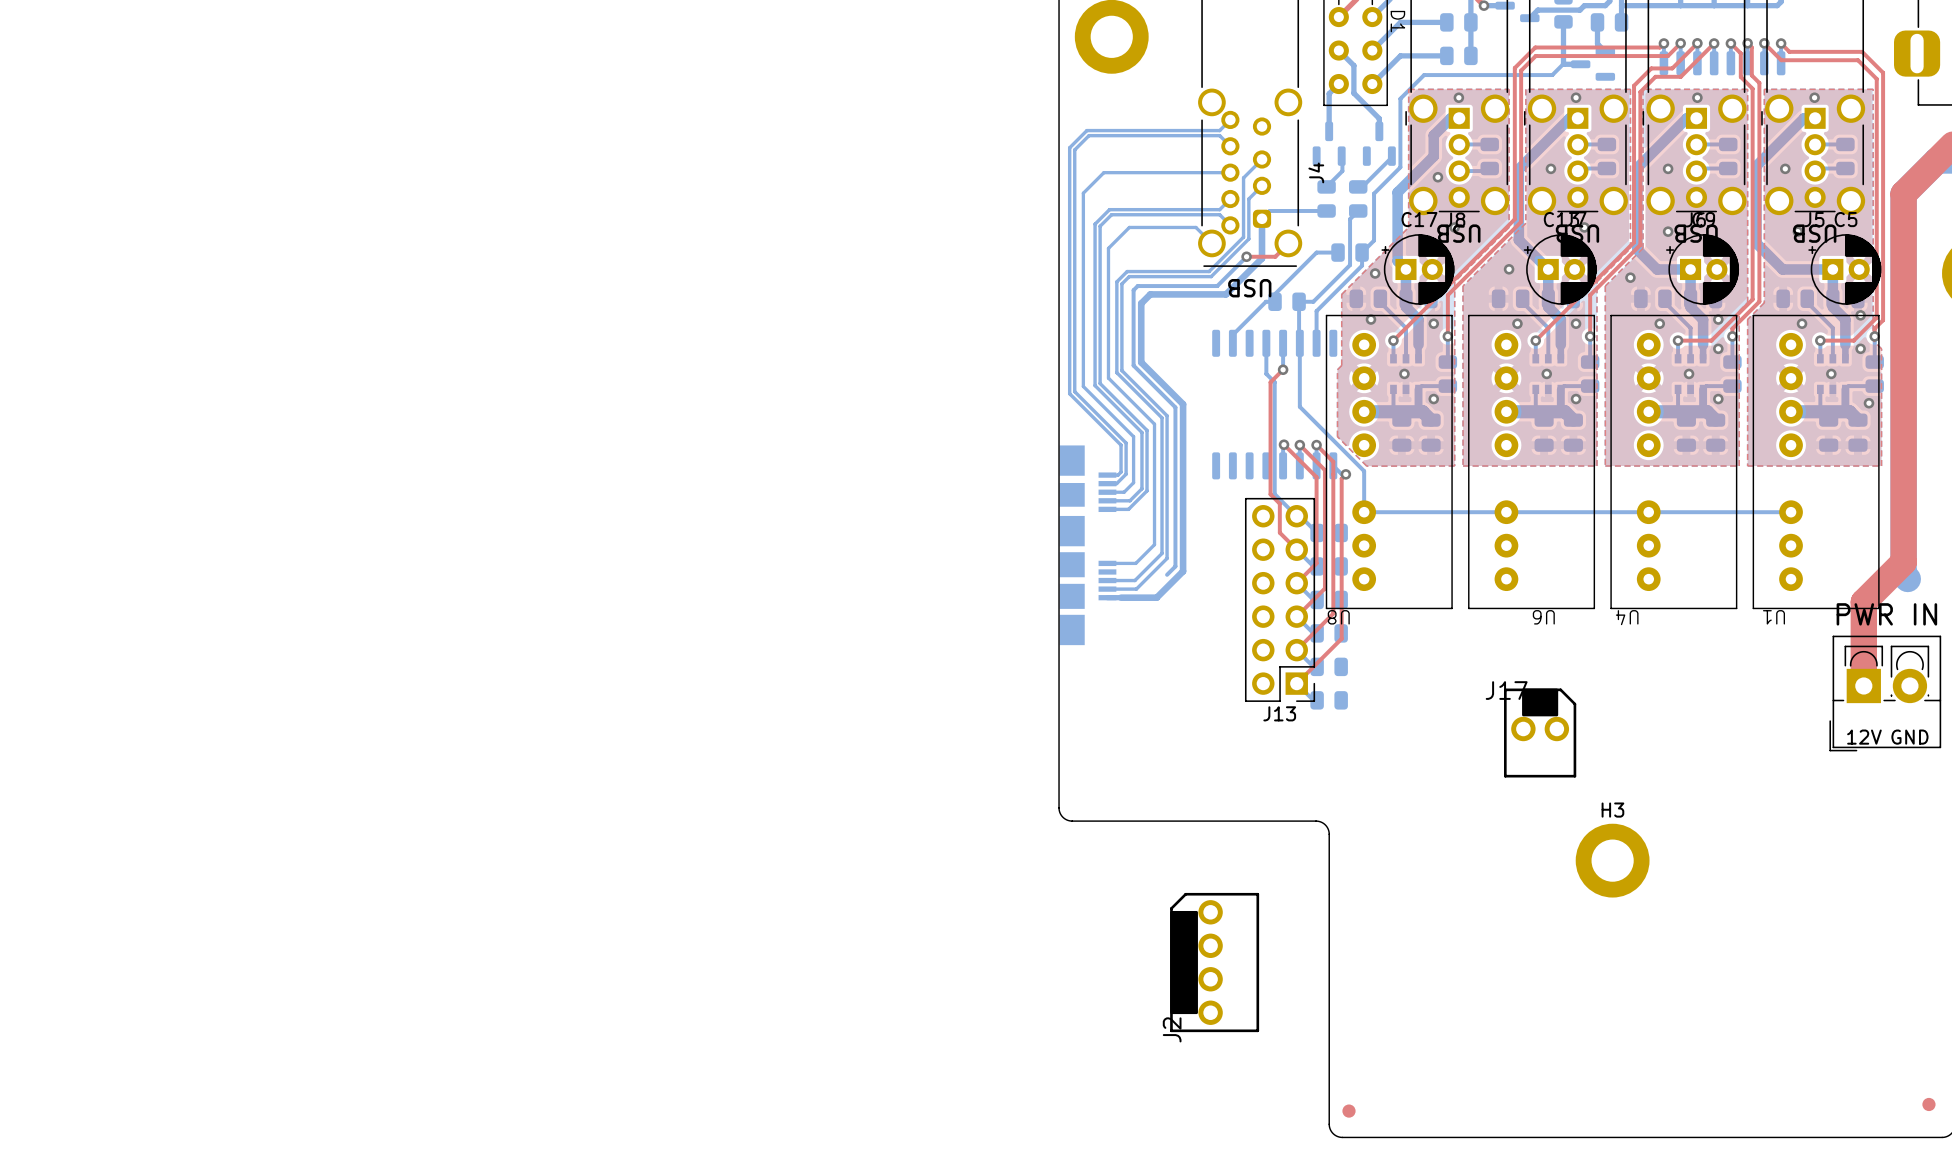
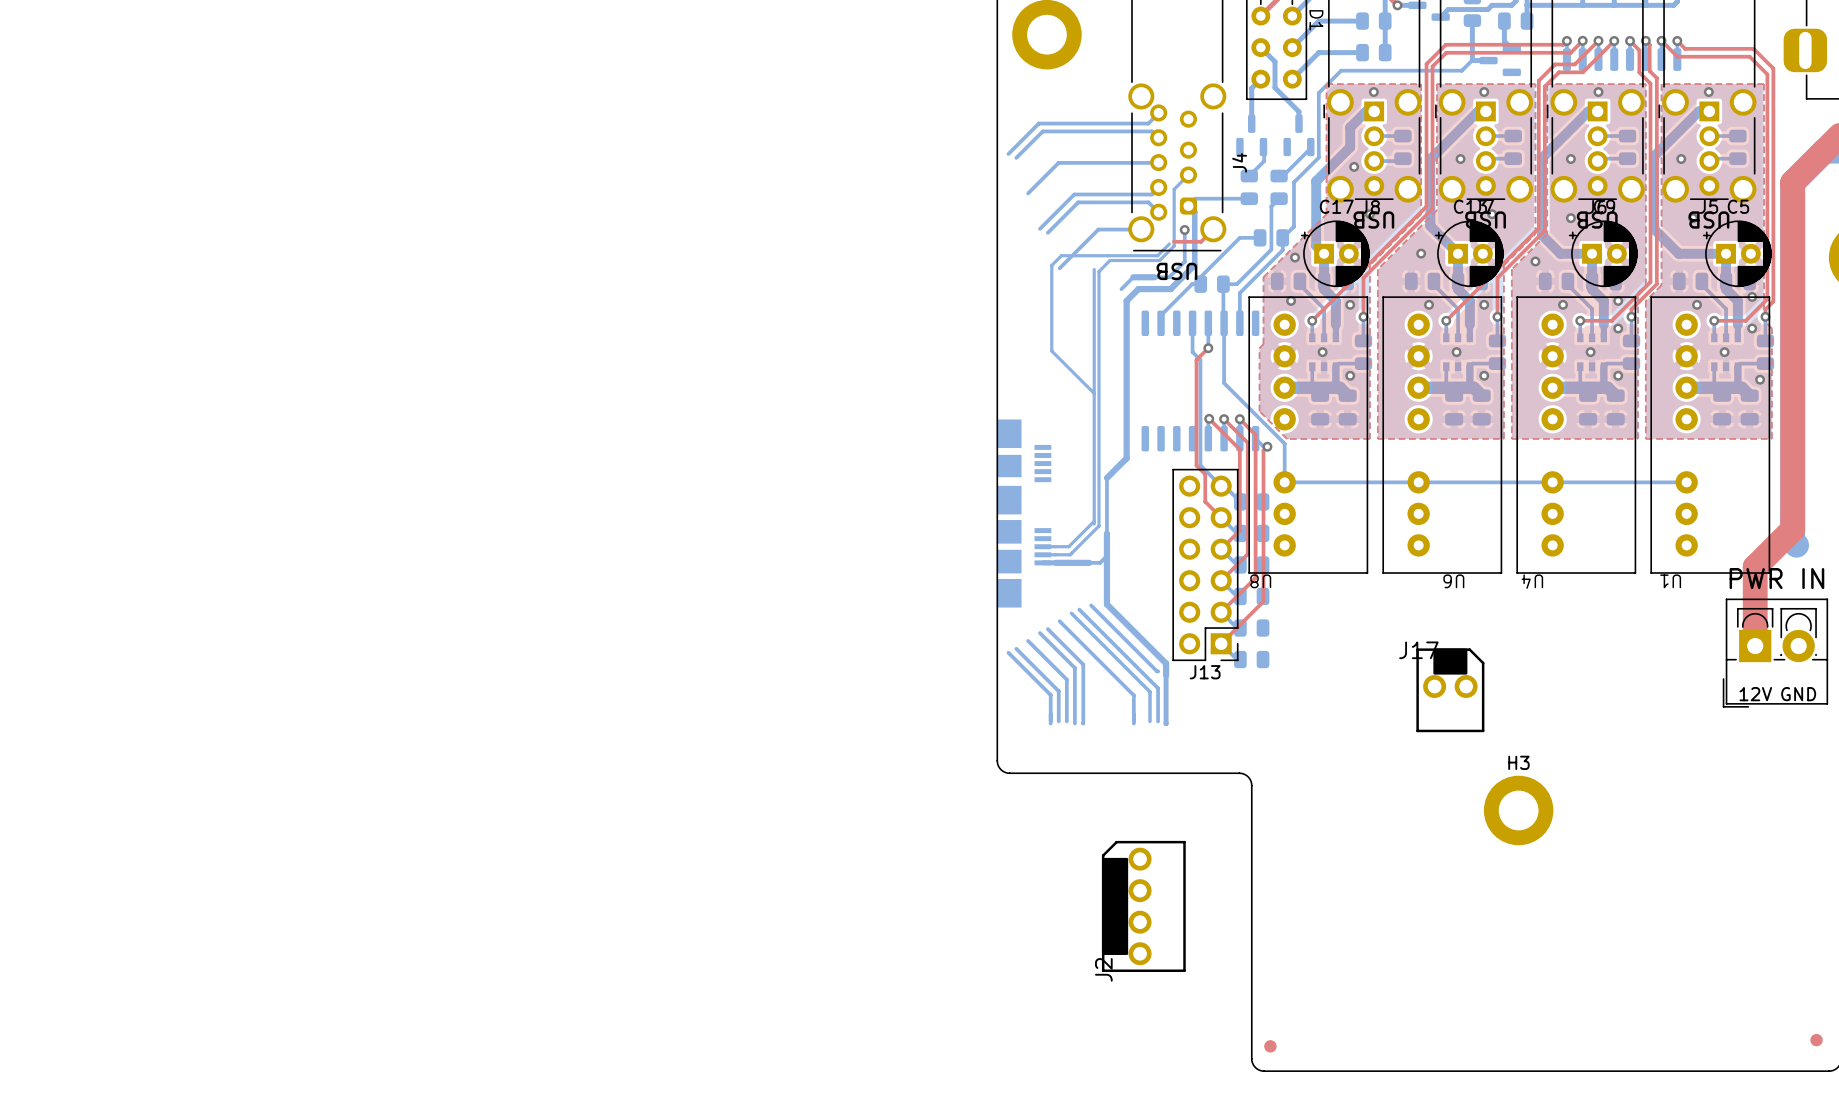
bottom track: (1230, 119) (1219, 130) (1086, 130) (1069, 147) (1069, 393) (1121, 445) (1121, 472) (1118, 475) (1107, 475) -> (1158, 113) (1148, 123) (1038, 123) (1008, 154)
bottom track: (1230, 146) (1219, 135) (1089, 135) (1074, 149) (1074, 391) (1126, 443) (1126, 474) (1116, 483) (1107, 483) -> (1158, 138) (1152, 131) (1042, 131) (1016, 157)
bottom track: (1262, 159) (1243, 177) (1243, 237) (1209, 271) -> (1169, 244) (1157, 255) (1138, 255)
bottom track: (1230, 172) (1103, 172) (1083, 193) (1083, 386) (1133, 436) (1133, 482) (1124, 492) (1107, 492) -> (1158, 162) (1058, 162) (1028, 193)
bottom track: (1230, 199) (1219, 209) (1109, 209) (1095, 224) (1095, 385) (1141, 432) (1141, 488) (1129, 500) (1107, 500) -> (1158, 187) (1151, 194) (1074, 194) (1039, 228)
bottom track: (1248, 199) (1248, 238) (1211, 276) -> (1176, 187) (1174, 189) (1174, 245) (1159, 260) (1140, 260)
bottom track: (1262, 219) (1262, 258) (1226, 294) -> (1184, 229) (1184, 261) (1169, 277) (1154, 277)
bottom track: (1230, 225) (1219, 214) (1111, 214) (1100, 226) (1100, 383) (1147, 430) (1147, 490) (1128, 509) (1107, 509) -> (1158, 212) (1148, 202) (1078, 202) (1047, 232)
bottom track: (1211, 243) (1195, 227) (1129, 227) (1108, 248) (1108, 378) (1154, 424) (1154, 544) (1135, 563) (1107, 563) -> (1141, 229) (1098, 229) (1059, 268)
bottom track: (1246, 256) (1217, 286) (1137, 286) (1133, 290) (1133, 365) (1175, 407) (1175, 507) -> (1188, 206) (1194, 212) (1194, 265) (1170, 289) (1138, 289) (1126, 300) (1126, 458) (1106, 478)
via position: (1246, 256) -> (1184, 229)
bottom track: (1178, 276) (1129, 276) (1121, 283) (1121, 370) (1167, 415) (1167, 558) -> (1110, 260) (1099, 271) (1099, 525)
bottom track: (1203, 294) (1150, 294) (1141, 303) (1141, 362) (1183, 404) (1183, 571) (1156, 597) -> (1133, 277) (1121, 289)
bottom track: (1175, 566) (1167, 574) -> (1106, 533) (1106, 604) (1166, 663) (1166, 723)
bottom track: none -> (1106, 556) (1100, 562) (1089, 562)
bottom track: none -> (1091, 605) (1158, 671)
bottom track: none -> (1079, 609) (1158, 688) (1158, 721)
bottom track: none -> (1071, 613) (1149, 691) (1149, 721)
bottom track: none -> (1059, 621) (1133, 695) (1133, 723)
bottom track: none -> (1047, 629) (1083, 664) (1082, 723)
bottom track: none -> (1039, 633) (1074, 667) (1074, 723)
bottom track: none -> (1028, 640) (1066, 679) (1066, 721)
bottom track: none -> (1016, 648) (1058, 691) (1058, 721)
bottom track: none -> (1008, 652) (1050, 695) (1050, 723)

